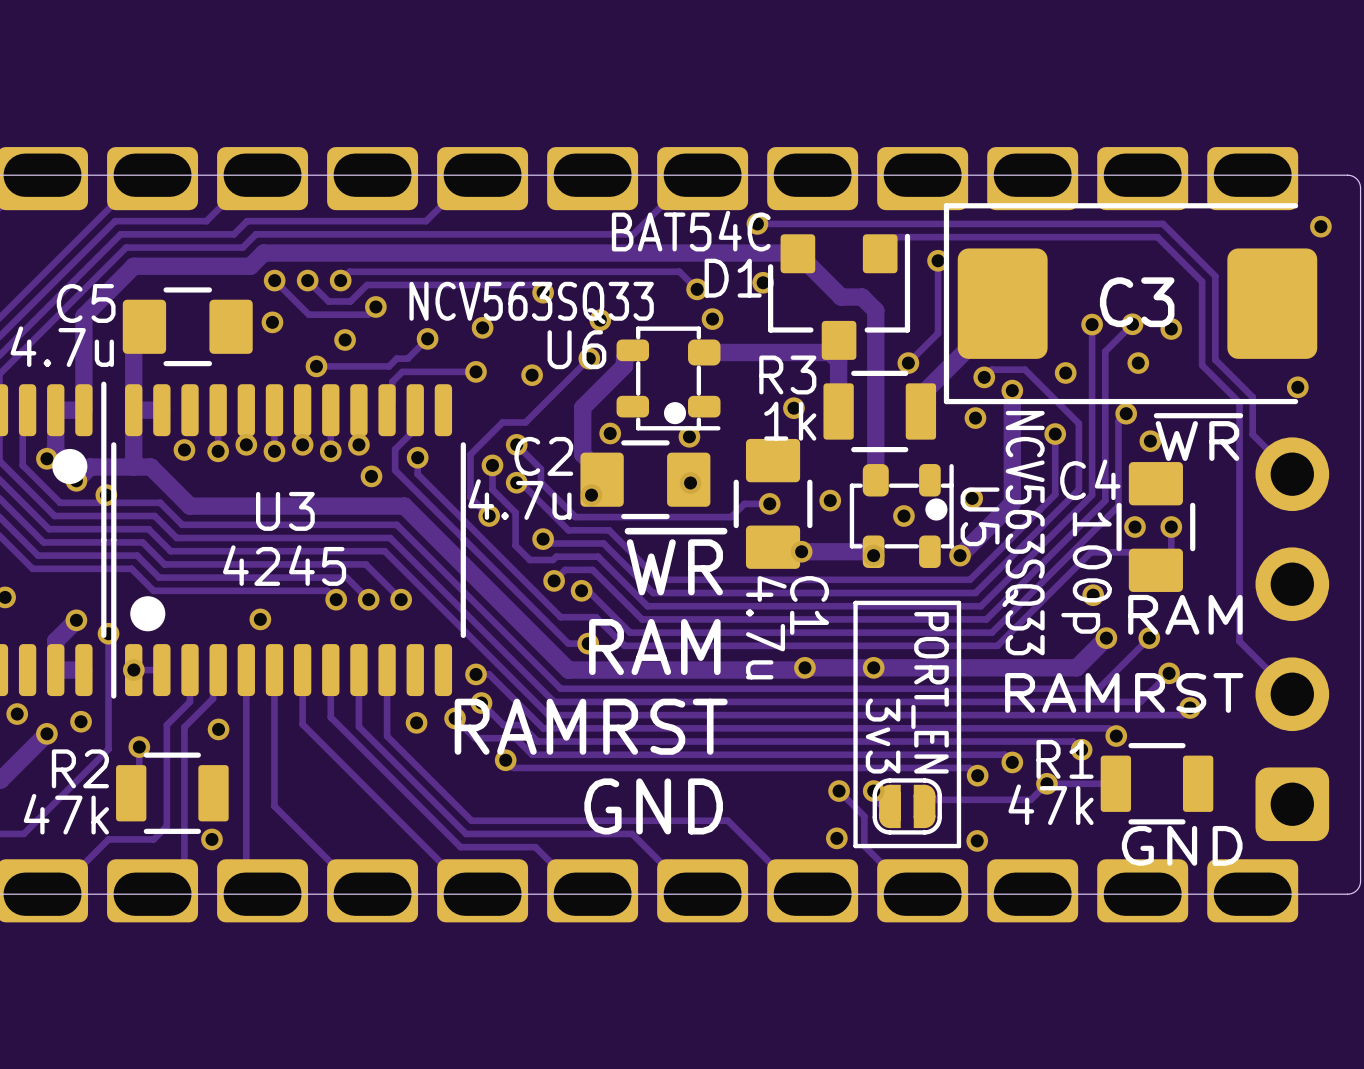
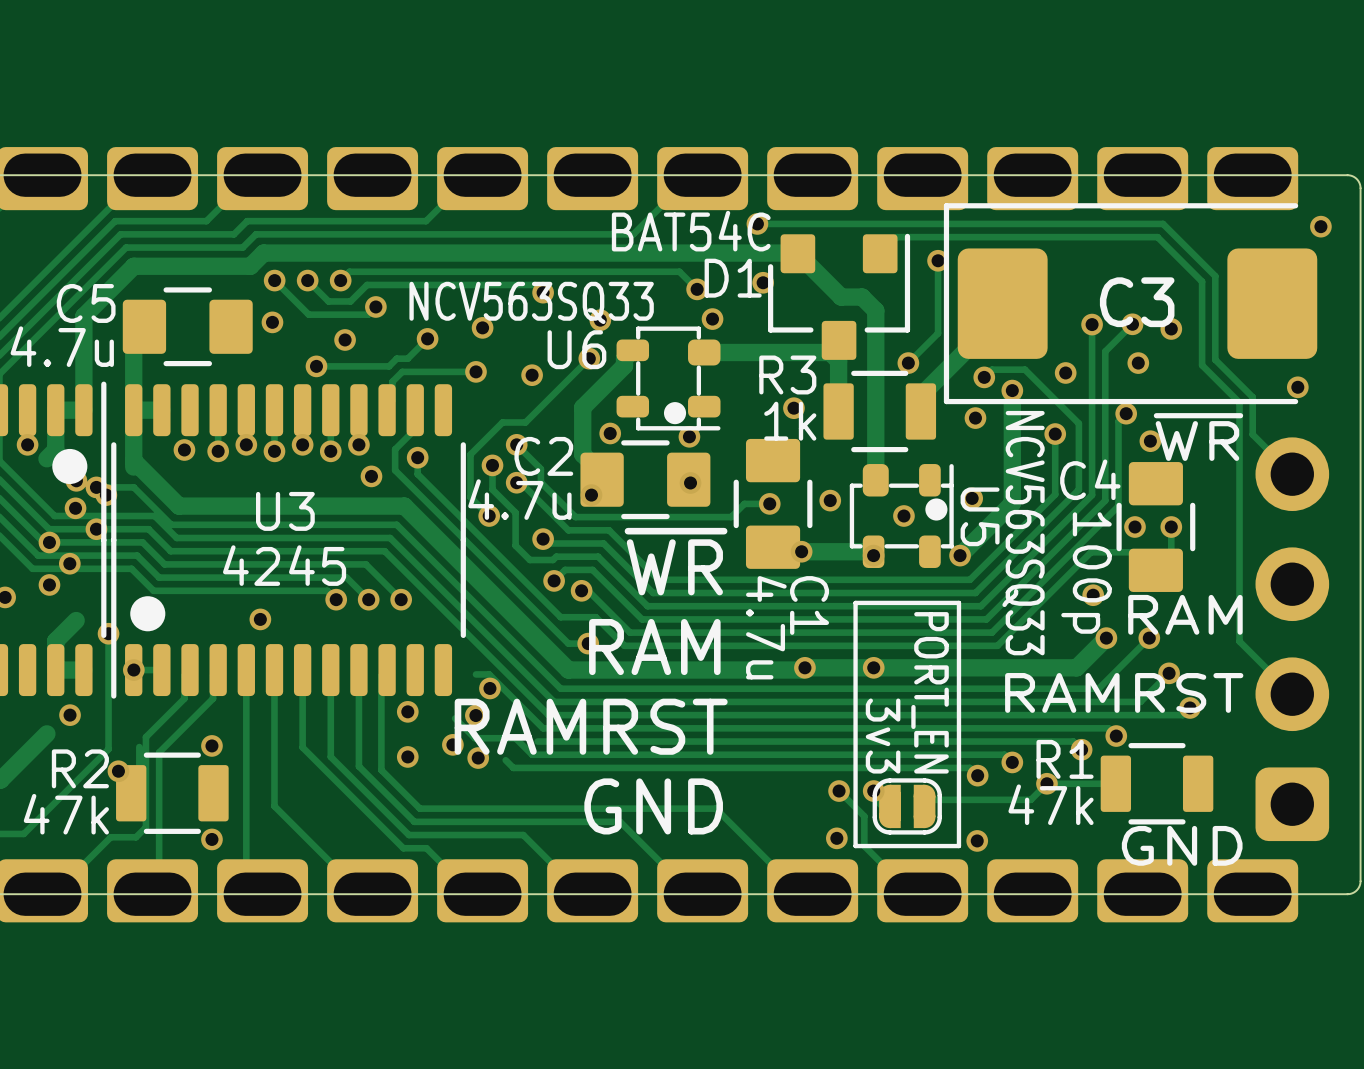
track: (27, 410) (22, 415) (22, 465) (60, 502) (98, 502) (106, 495) (114, 502) (160, 502) (182, 524) -> (96, 487) (133, 487) (171, 524) (182, 524)
via position: (46, 458) -> (27, 444)
track: (76, 480) (90, 467) (150, 467) (189, 506) -> (133, 460) (178, 506) (189, 506)
via: none -> (96, 487)
via: none -> (75, 508)
via: none -> (96, 529)
via: none -> (49, 542)
via: none -> (69, 563)
via: none -> (49, 584)
via: (76, 620) -> none
track: (190, 670) (190, 701) (166, 725) (166, 826) (153, 839) (108, 839) -> (190, 670) (184, 675) (184, 698) (145, 737) (145, 827) (136, 837) (110, 837) (108, 839)
track: (387, 670) (387, 736) (471, 820) (727, 820) -> (387, 670) (381, 675) (381, 770) (419, 808) (715, 808) (727, 820)
via: (475, 674) -> none
via: none -> (489, 688)
track: (481, 703) (503, 725) (521, 725) (537, 741) -> none
via: (481, 703) -> none
via: (17, 714) -> none
via: none -> (475, 715)
track: (330, 717) (460, 847) (535, 847) -> (330, 717) (330, 756) (408, 835) (523, 835) (535, 847)
via: (455, 718) -> none
via position: (81, 721) -> (70, 715)
via position: (416, 722) -> (407, 711)
track: (302, 724) (426, 848) -> (302, 724) (302, 747) (403, 848) (426, 848)
track: (358, 726) (466, 833) (632, 833) -> (358, 726) (358, 766) (414, 821) (620, 821) (632, 833)
track: (184, 727) (184, 862) (159, 887) -> (184, 727) (159, 752) (159, 887)
via position: (218, 729) -> (211, 745)
via: (46, 733) -> none
via: none -> (452, 744)
via: (139, 747) -> none
via: none -> (407, 756)
via: none -> (478, 758)
via: (505, 760) -> none
via: none -> (118, 771)

